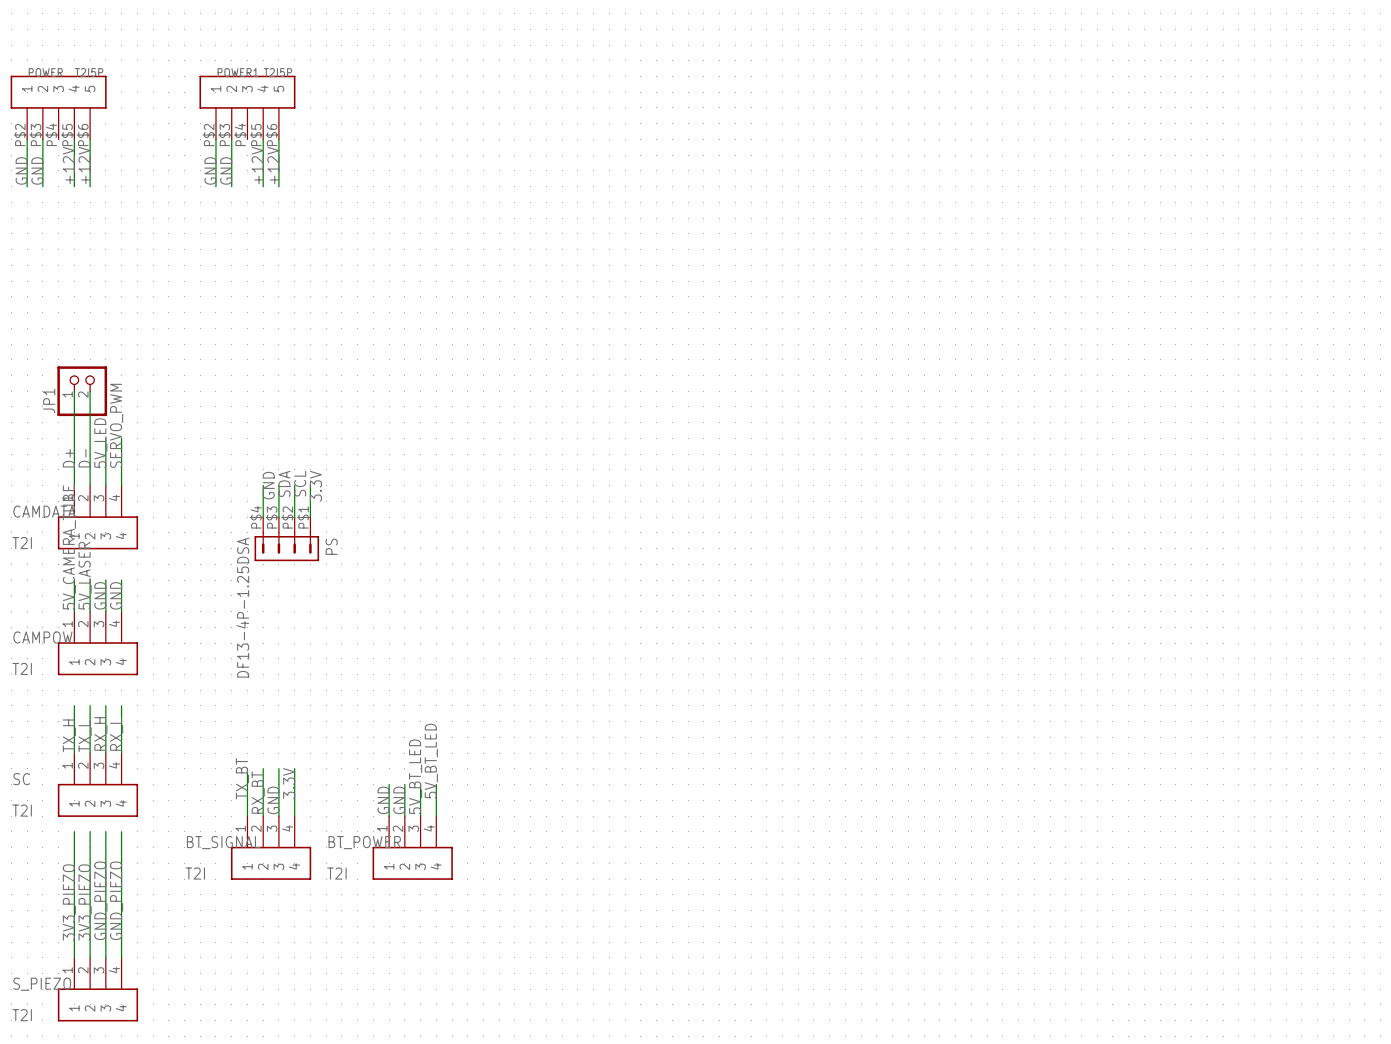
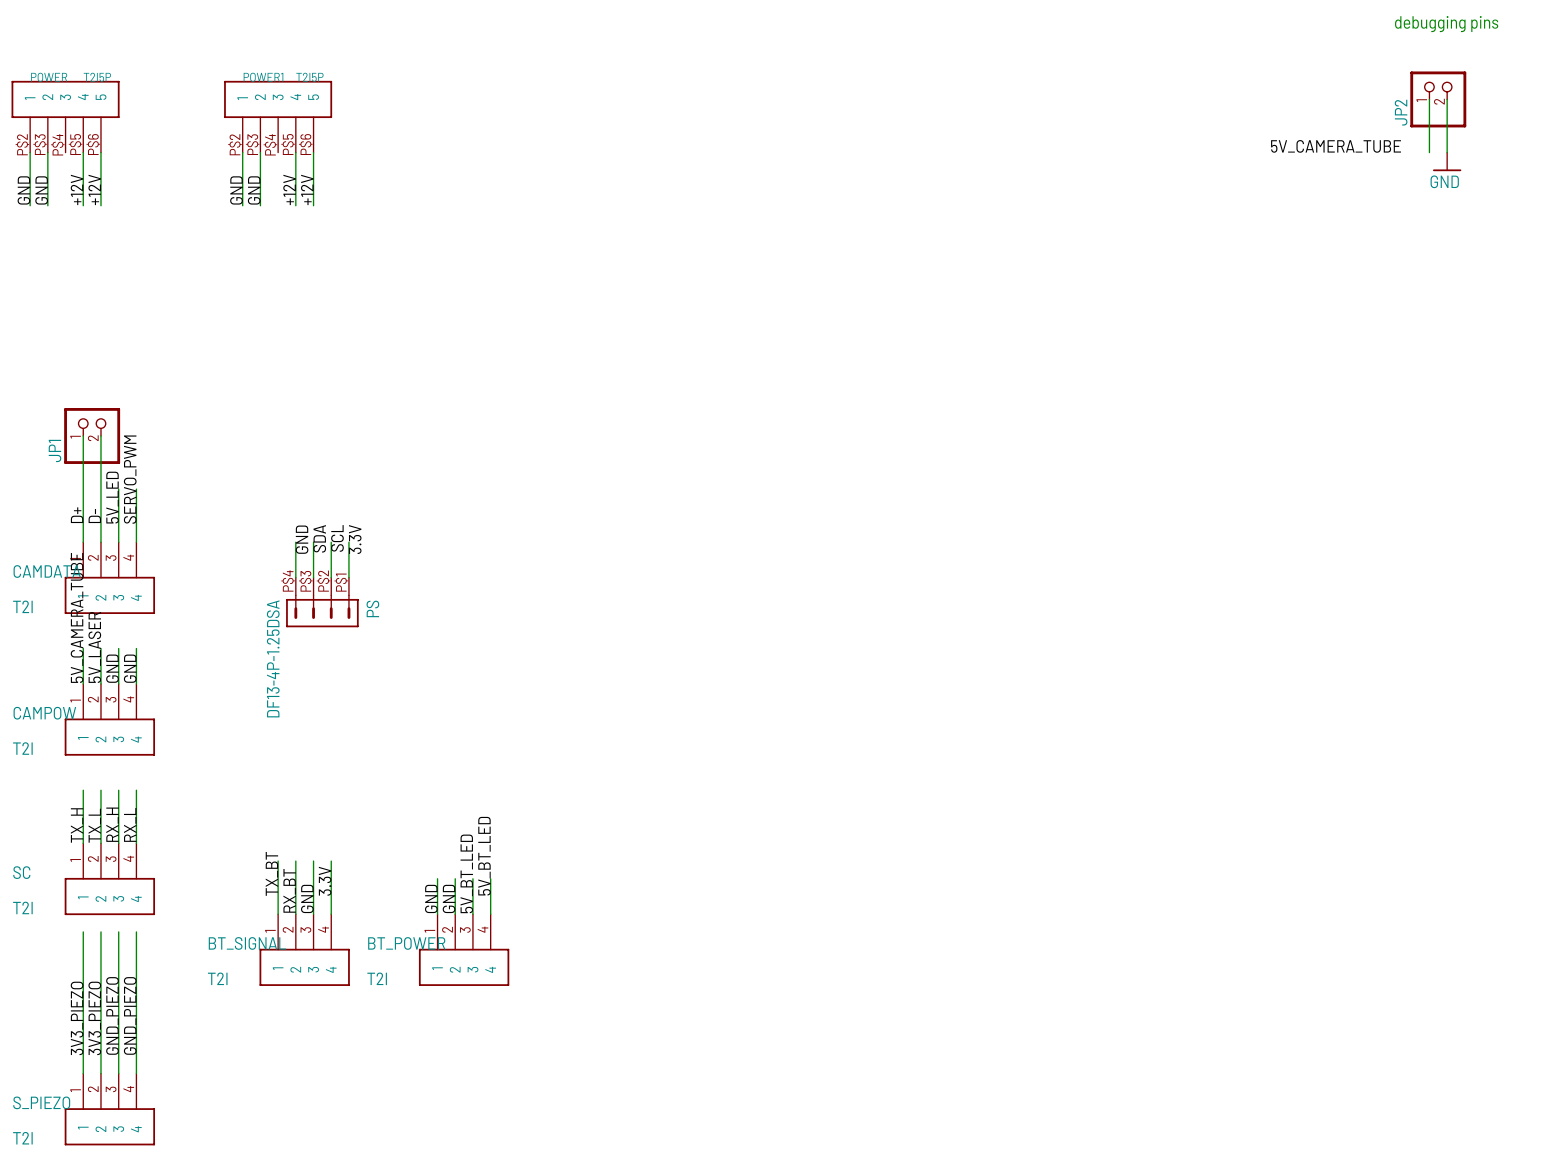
text: none -> debugging pins (1446, 24)
wire: none -> (1429, 99) (1429, 152)
JP2: none -> (1438, 99)
wire: none -> (1447, 99) (1447, 152)
label: none -> 5V_CAMERA_TUBE (1336, 146)
power symbol: none -> GND (1447, 161)

